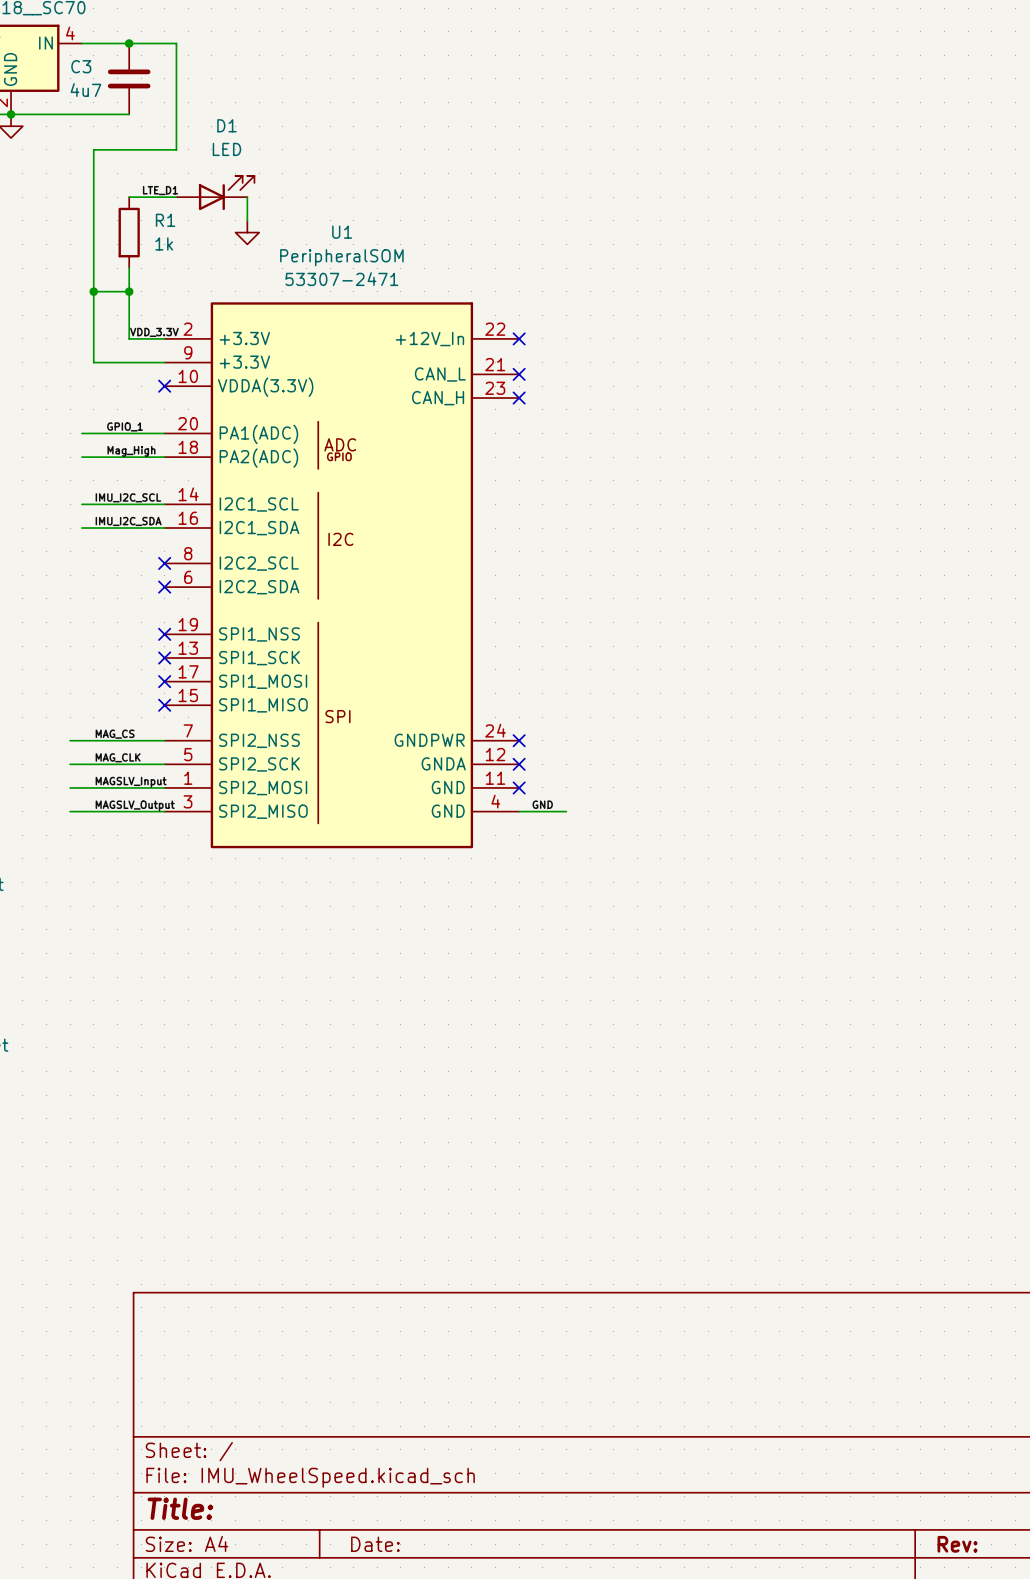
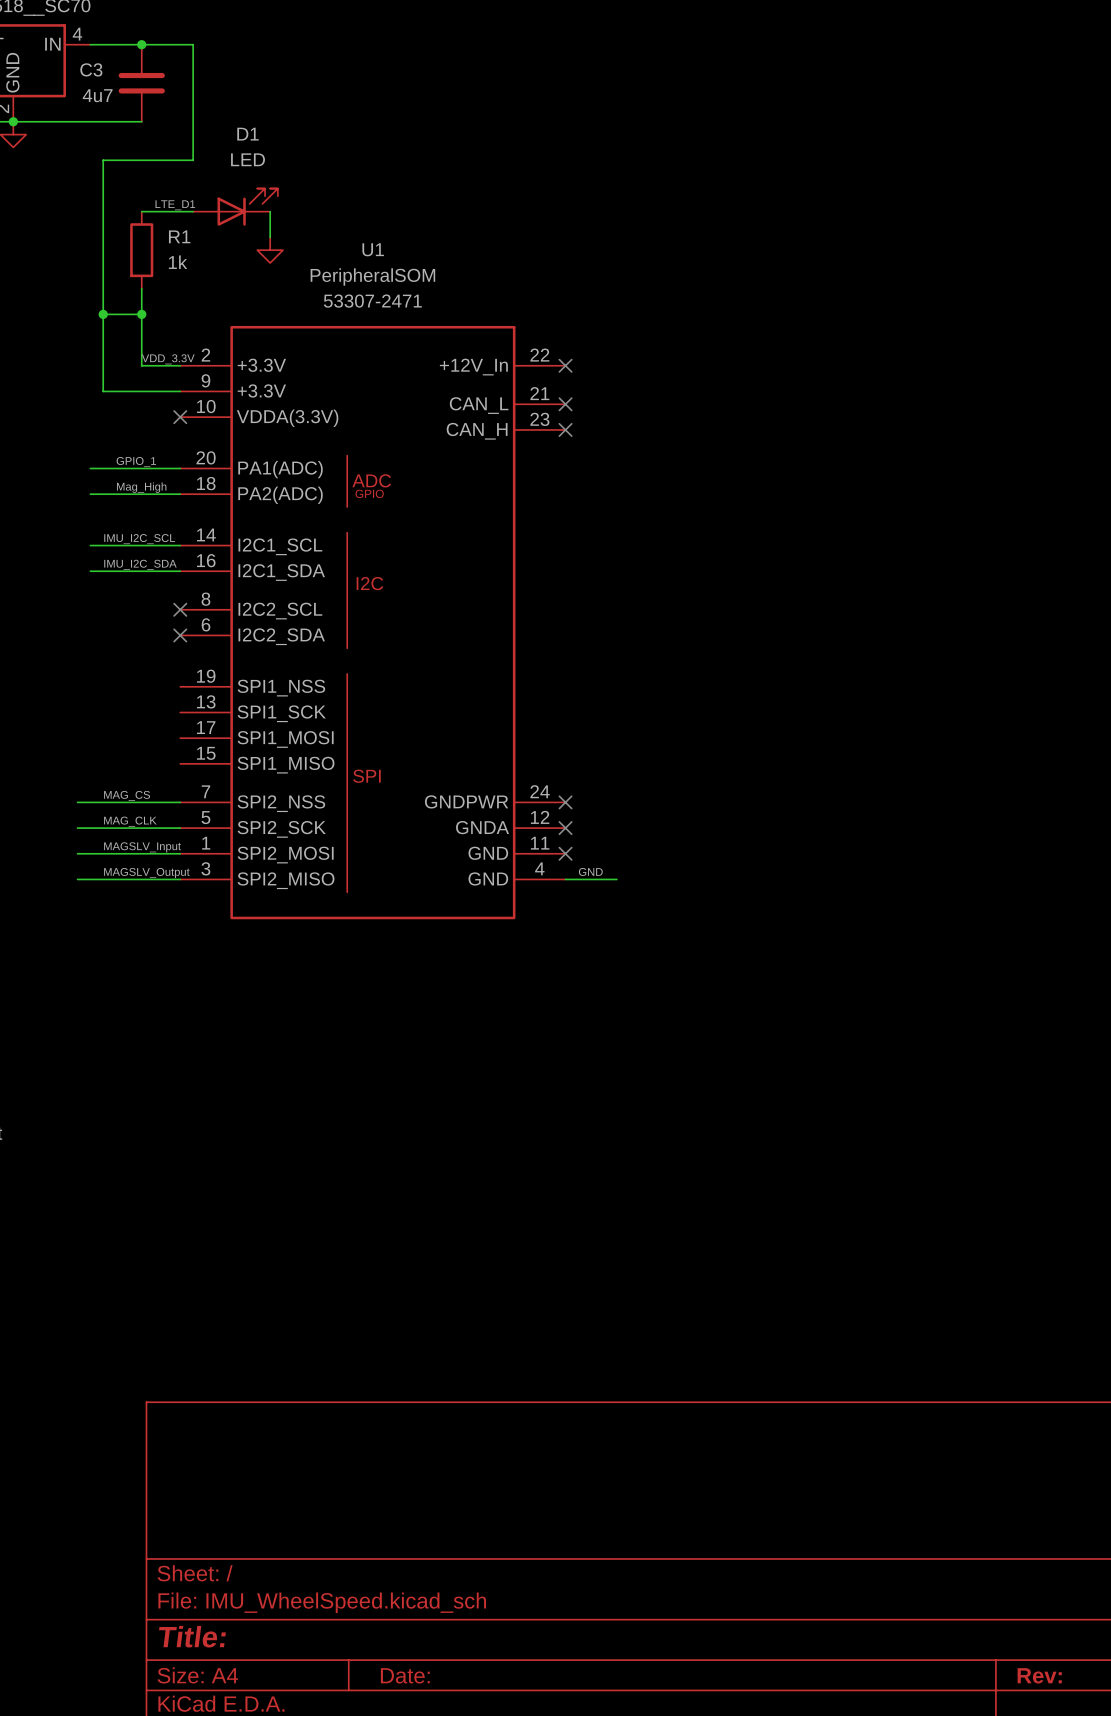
no-connect mark: (164, 634) -> none
no-connect mark: (164, 657) -> none
no-connect mark: (164, 681) -> none
no-connect mark: (164, 705) -> none

